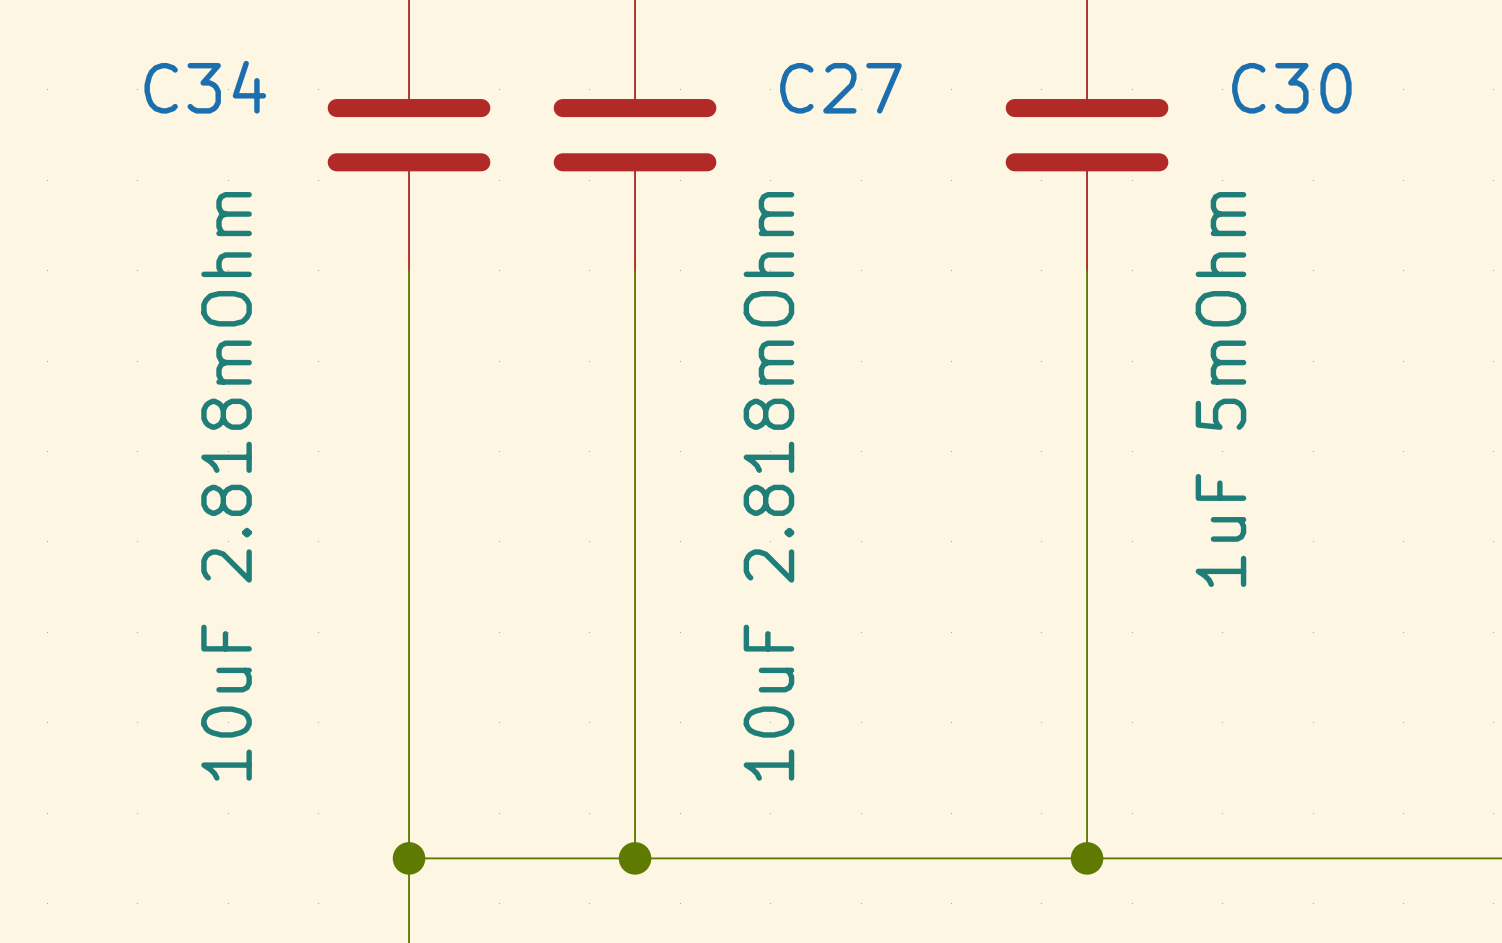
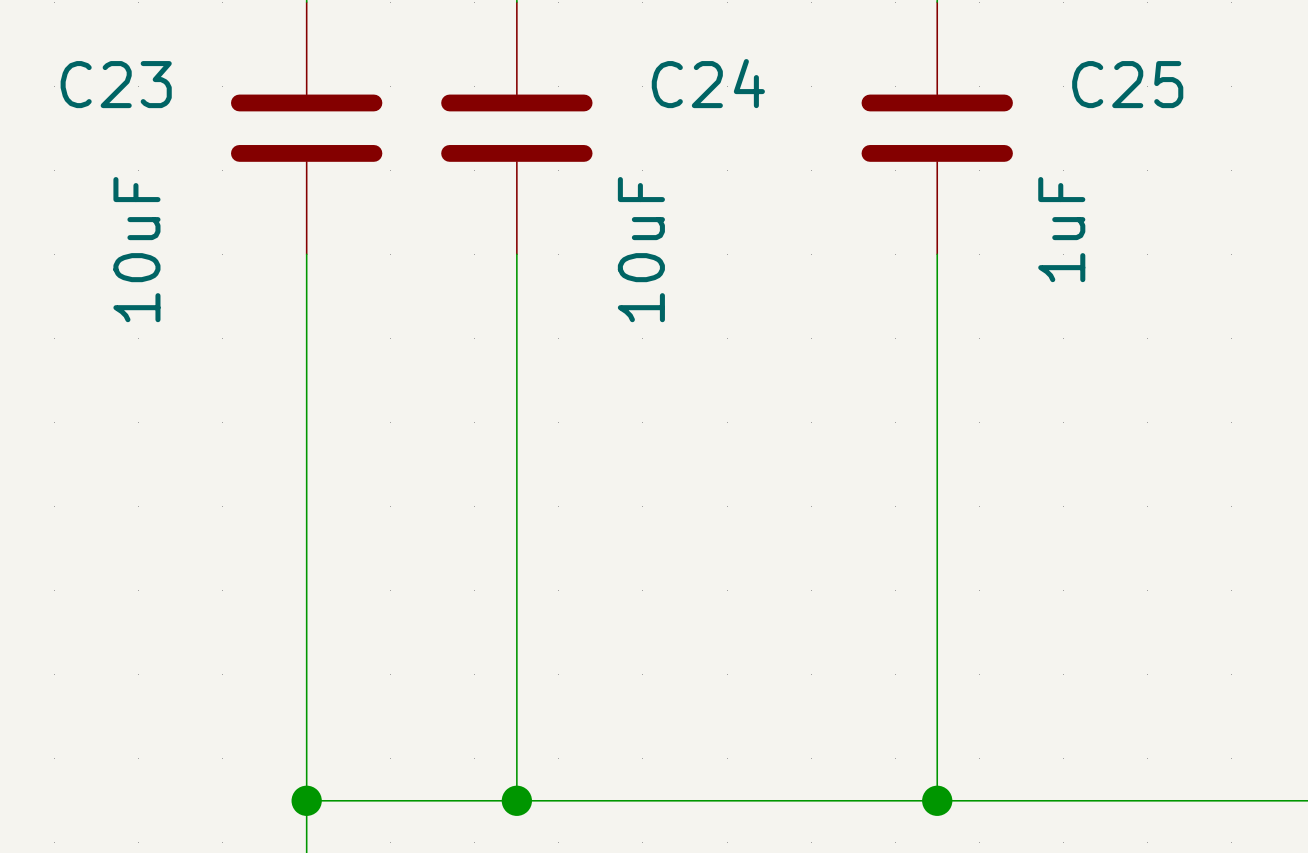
C34 name: C34 (205, 87) -> C23 (116, 84)
C27 name: C27 (840, 88) -> C24 (708, 83)
C30 name: C30 (1291, 88) -> C25 (1127, 84)
C30 value: 1uF 5mOhm (1220, 389) -> 1uF (1061, 229)
C34 value: 10uF 2.818mOhm (226, 486) -> 10uF (136, 249)
C27 value: 10uF 2.818mOhm (768, 486) -> 10uF (641, 249)

